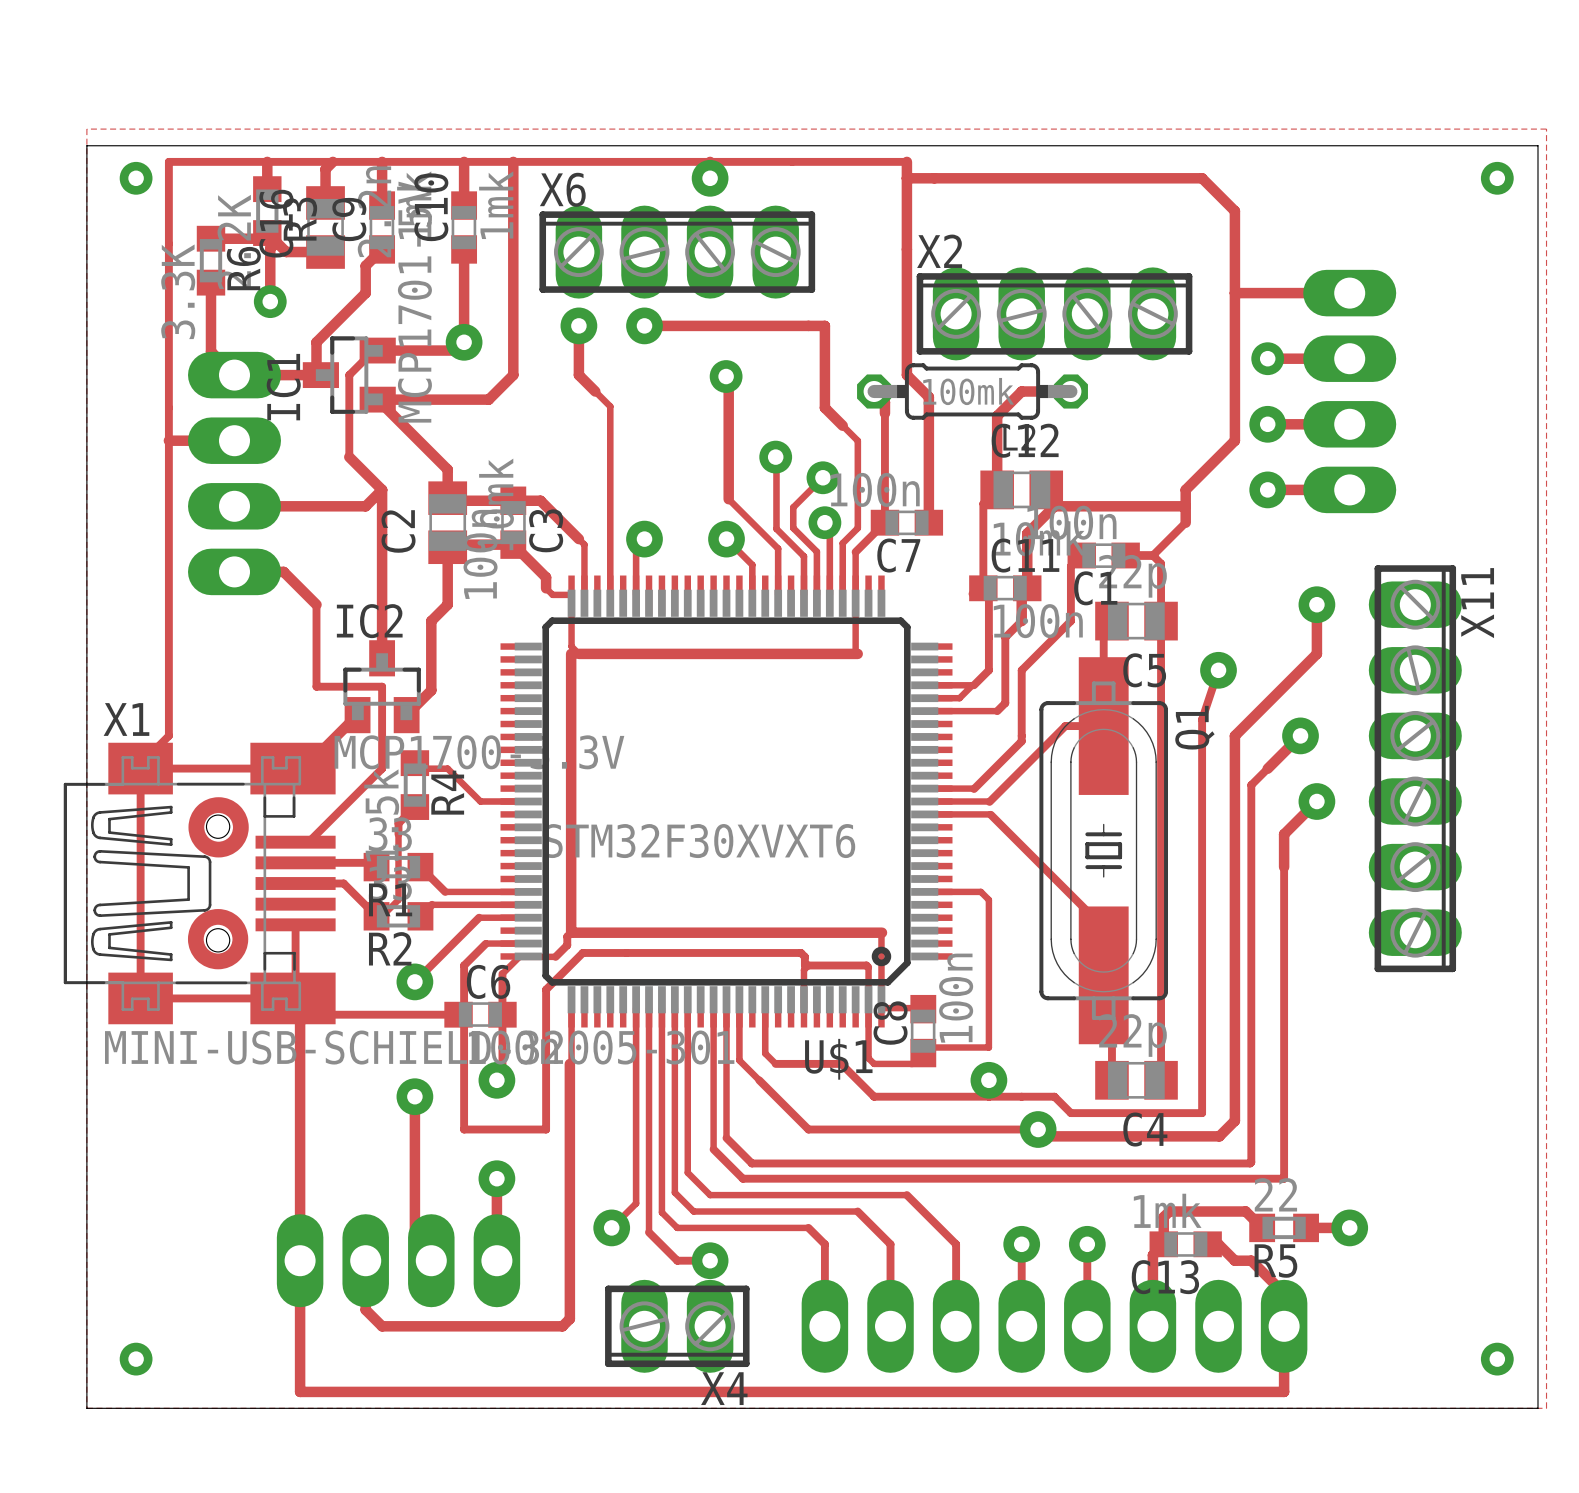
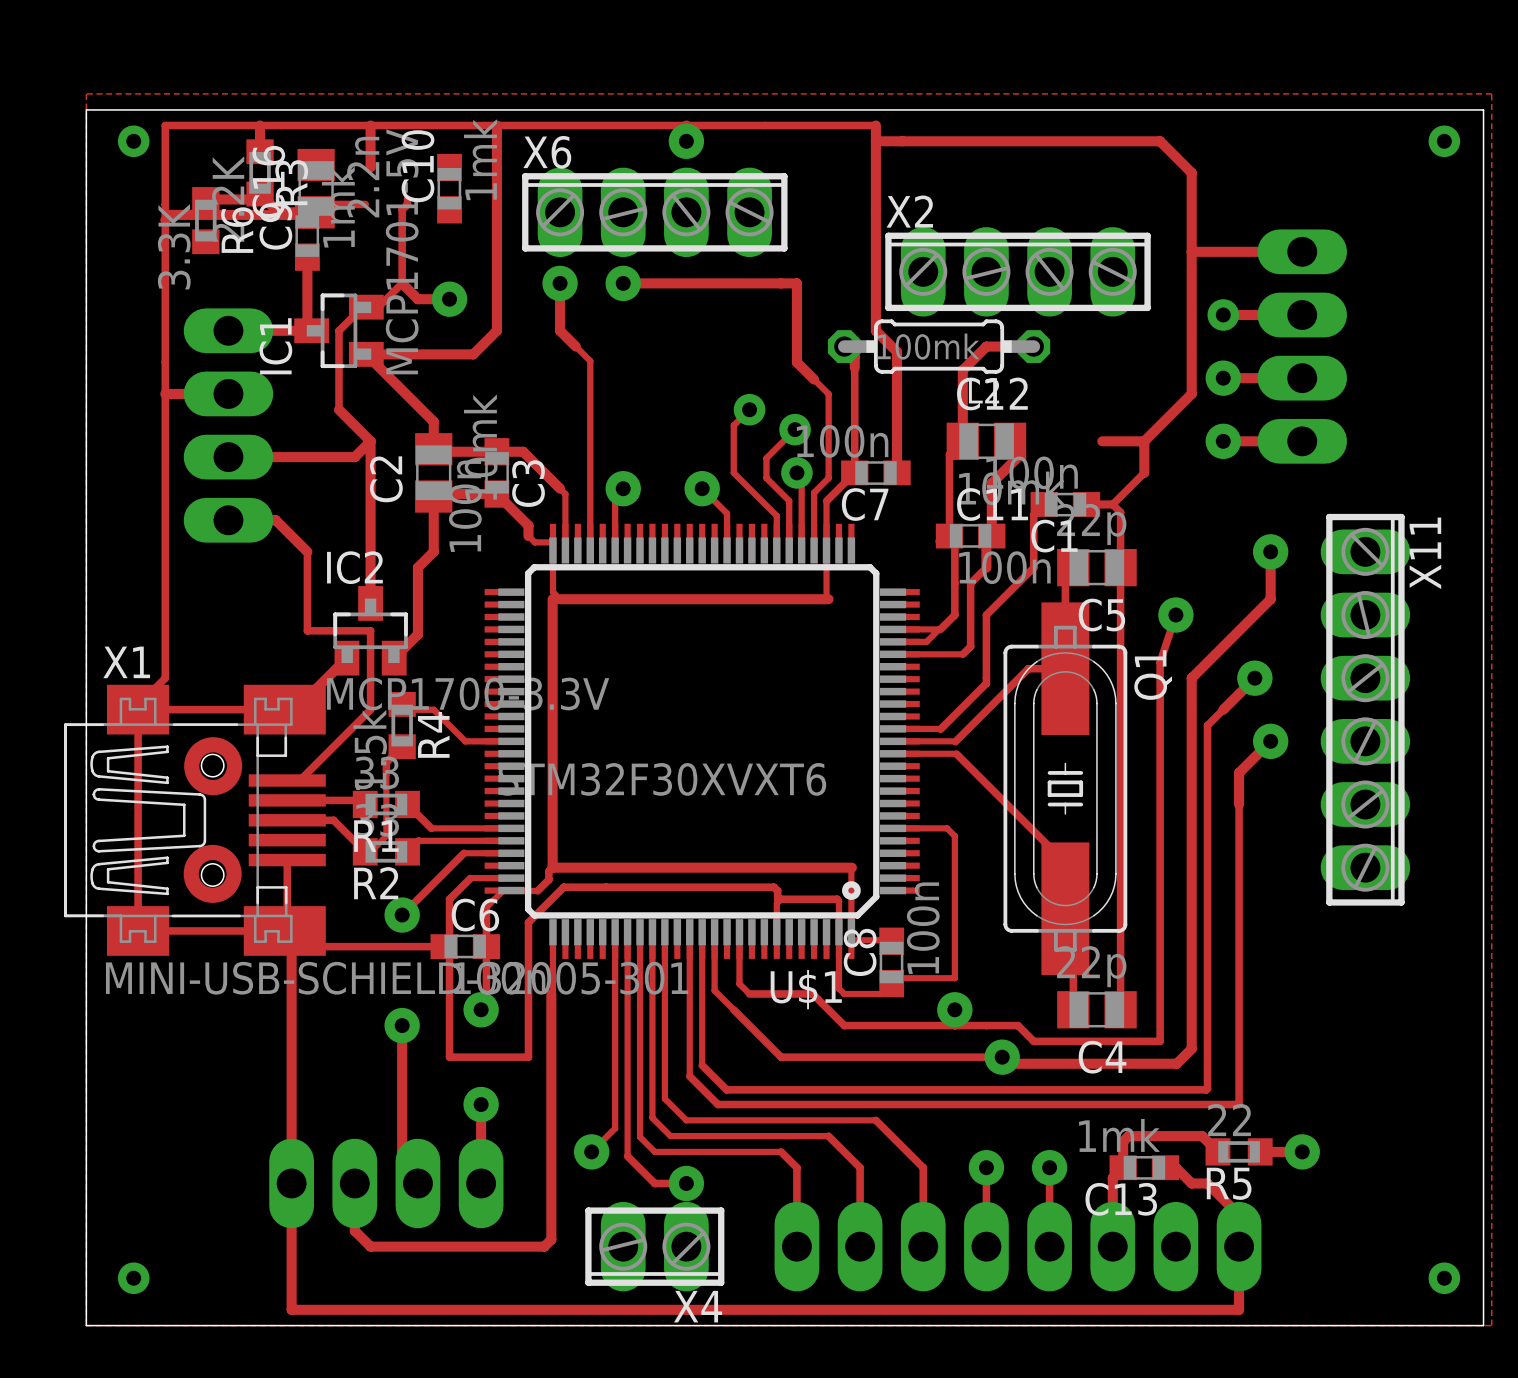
track: (332, 161) (325, 169) (325, 202) -> none
track: (464, 161) (464, 205) -> none
C9 position: (382, 227) -> (307, 236)
track: none -> (407, 199) (407, 204) (402, 209) (402, 283)
track: (276, 242) (270, 248) (270, 301) -> none
track: none -> (365, 204) (317, 204) (307, 214) (170, 214) (165, 220)
track: (382, 249) (365, 265) (365, 293) (316, 342) -> (307, 257) (307, 299)
track: (464, 249) (464, 342) (455, 350) (390, 350) -> (402, 283) (378, 307)
track: (210, 282) (210, 351) (234, 375) -> none
via: (270, 301) -> none
track: none -> (402, 283) (417, 299) (449, 299)
track: (726, 376) (728, 379) (728, 499) (778, 548) (778, 594) -> none
via: (726, 376) -> none
track: (775, 457) (776, 528) (803, 556) (803, 567) -> (749, 409) (733, 425) (733, 472) (776, 515)
track: none -> (1102, 441) (1144, 441)
track: (1054, 506) (1185, 506) -> none

